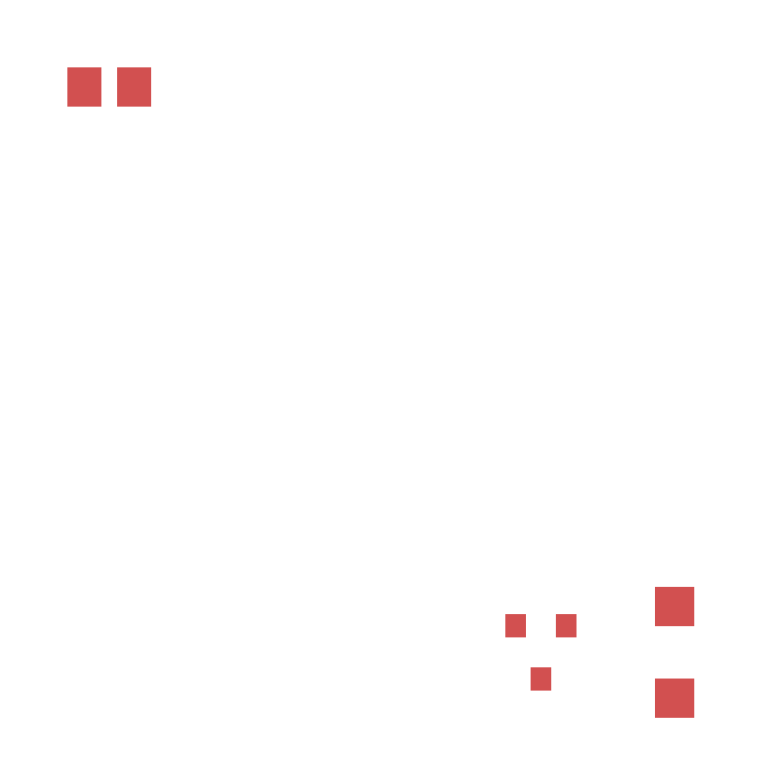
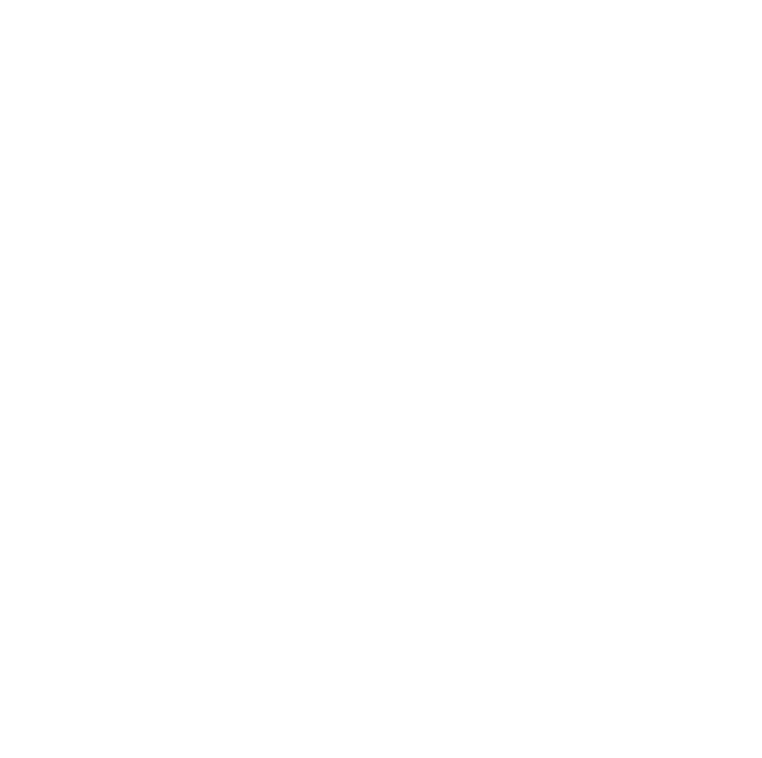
part: (109, 86) -> none
part: (540, 652) -> none
part: (674, 652) -> none

